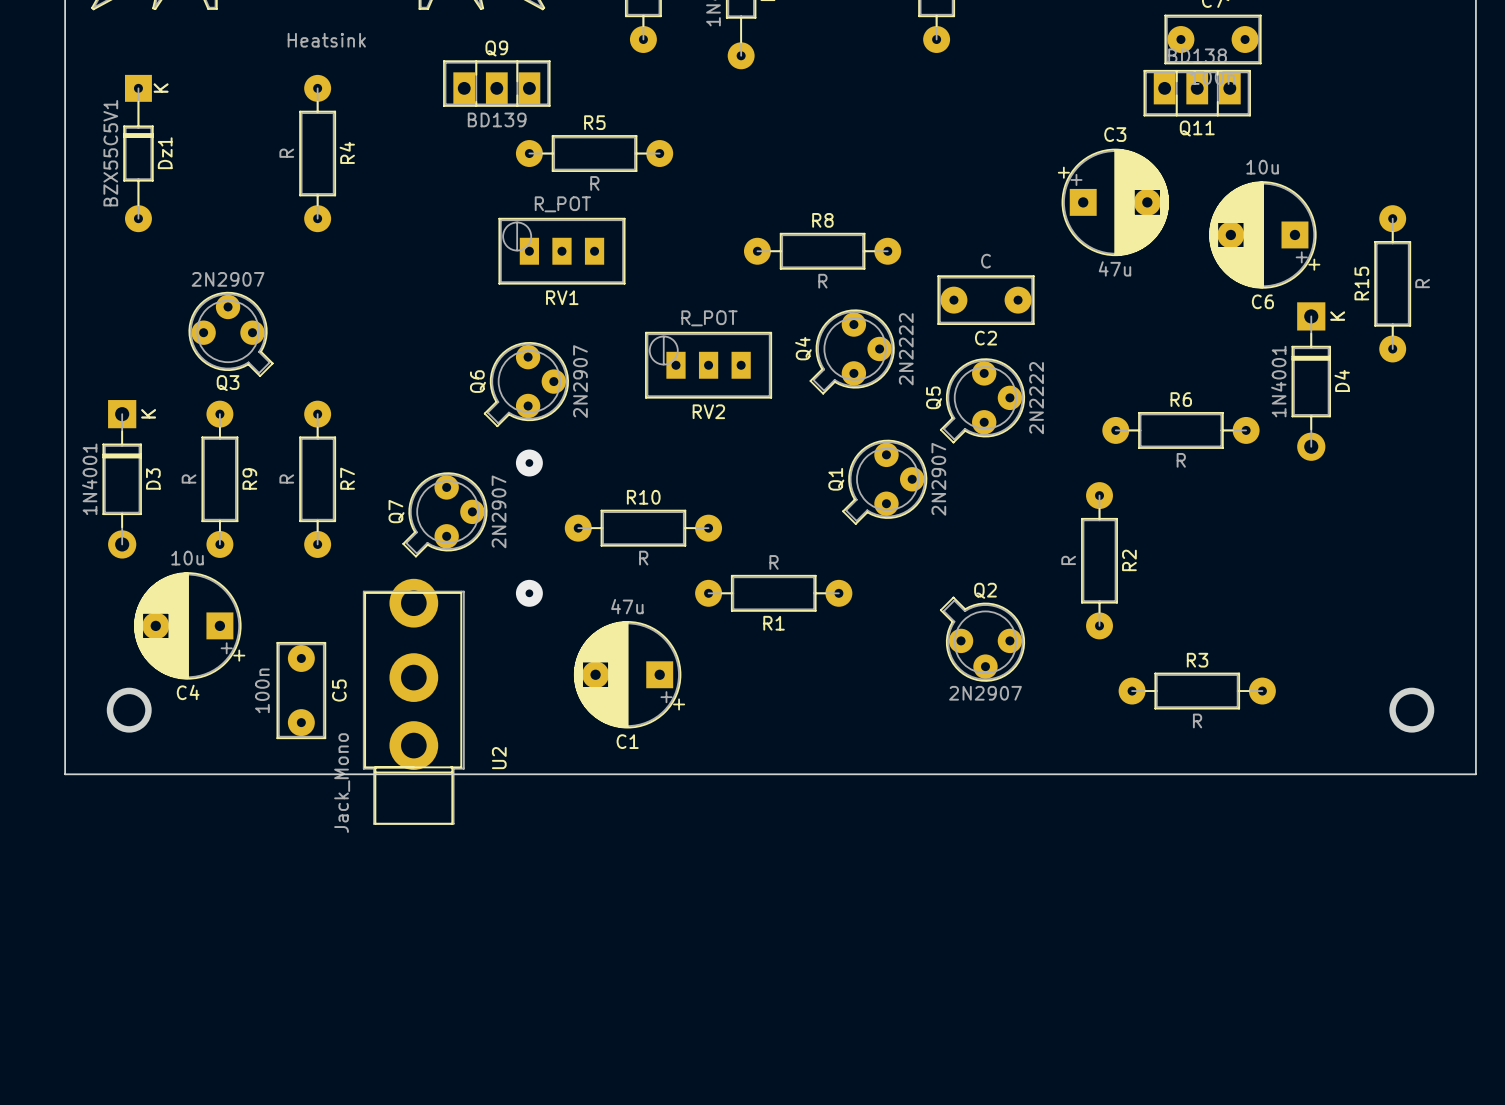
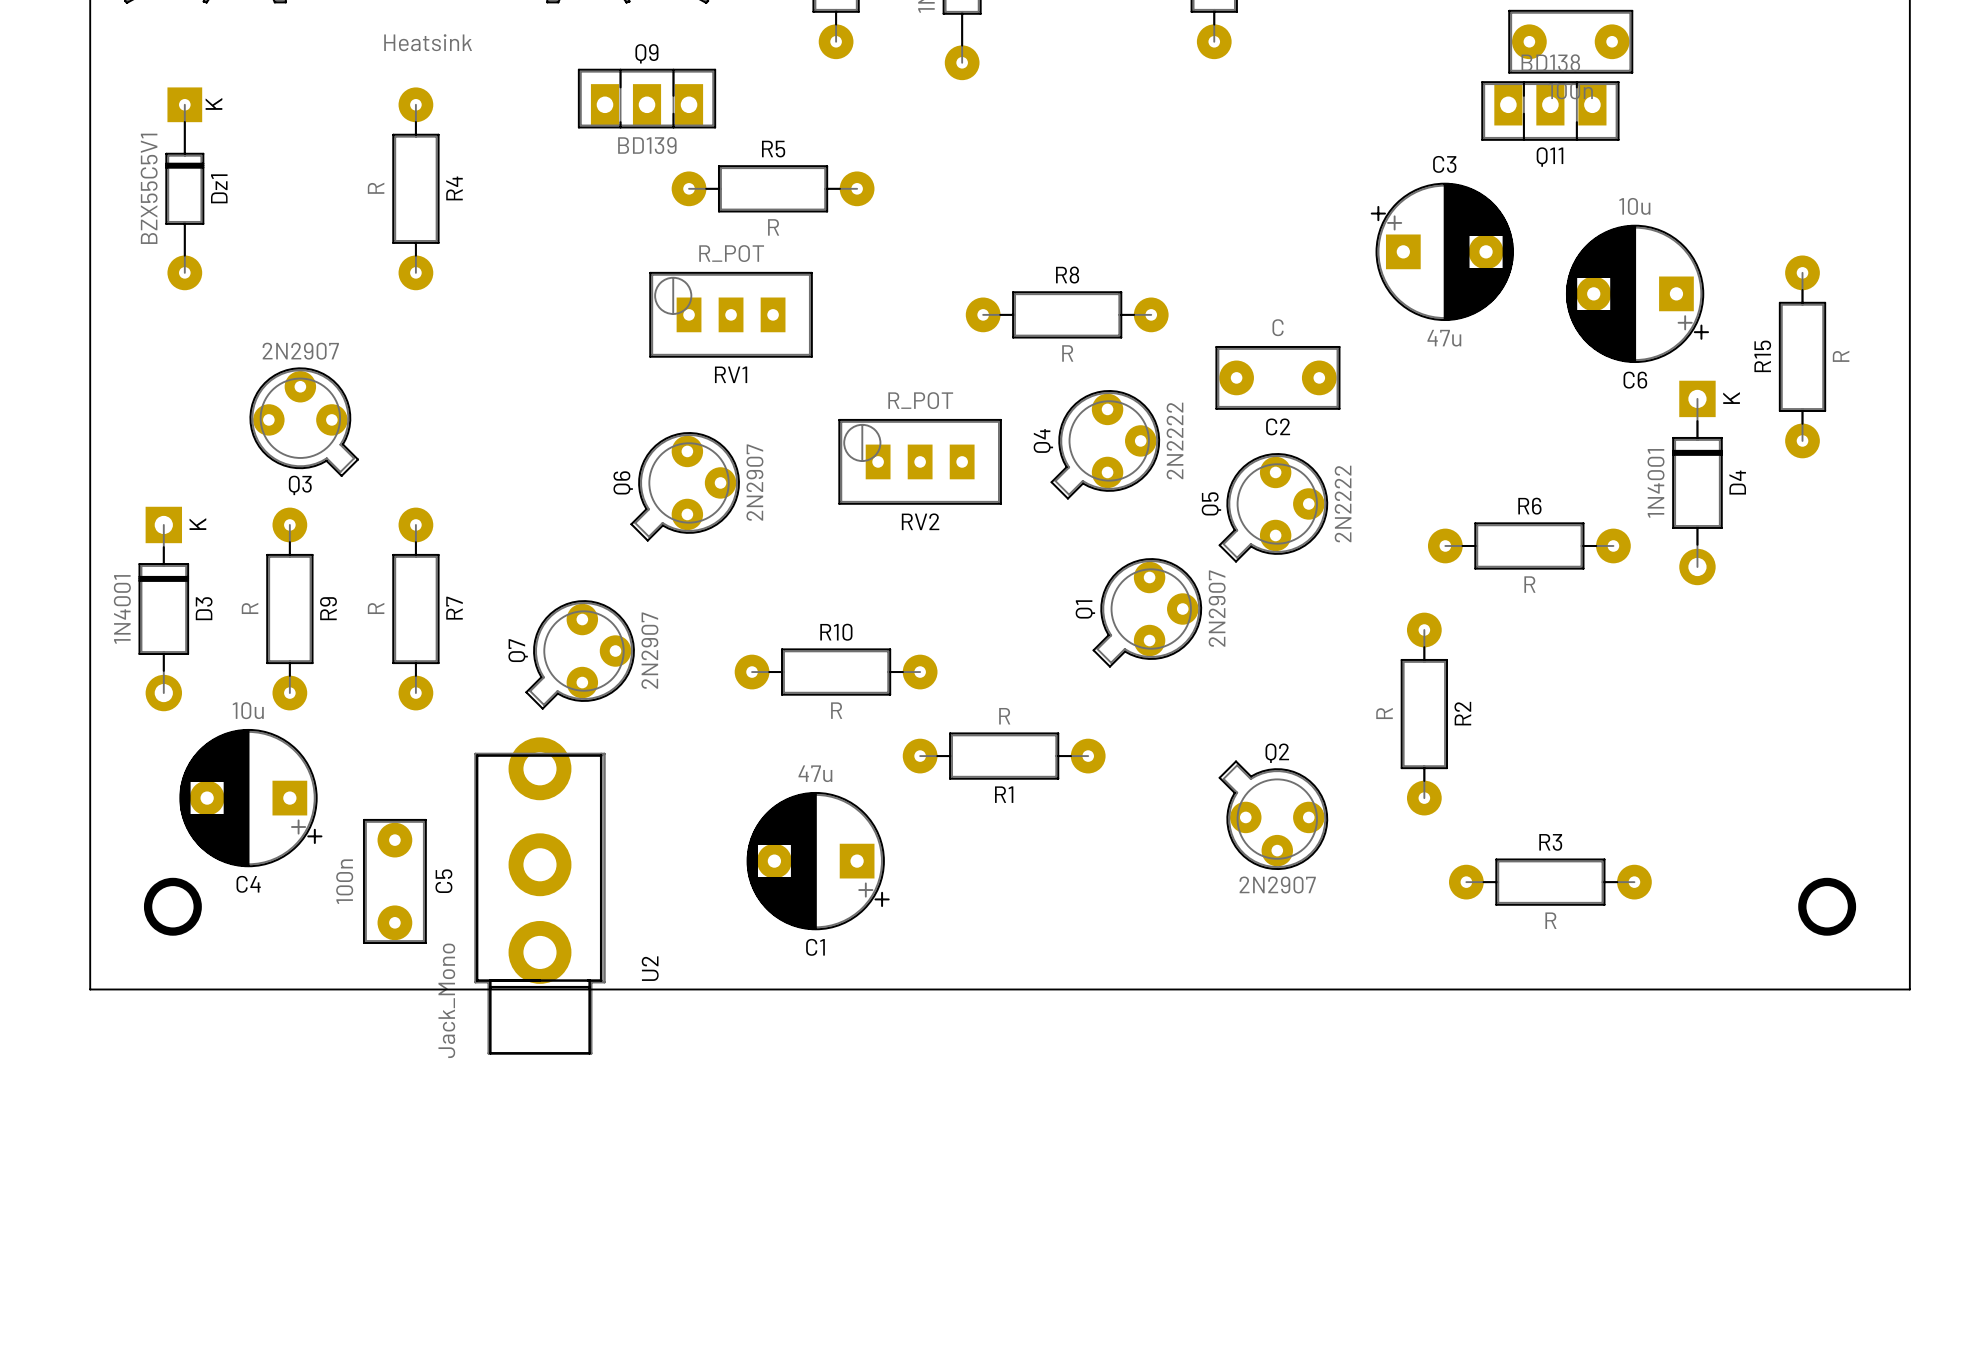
via: (529, 463) -> none
via: (529, 593) -> none

